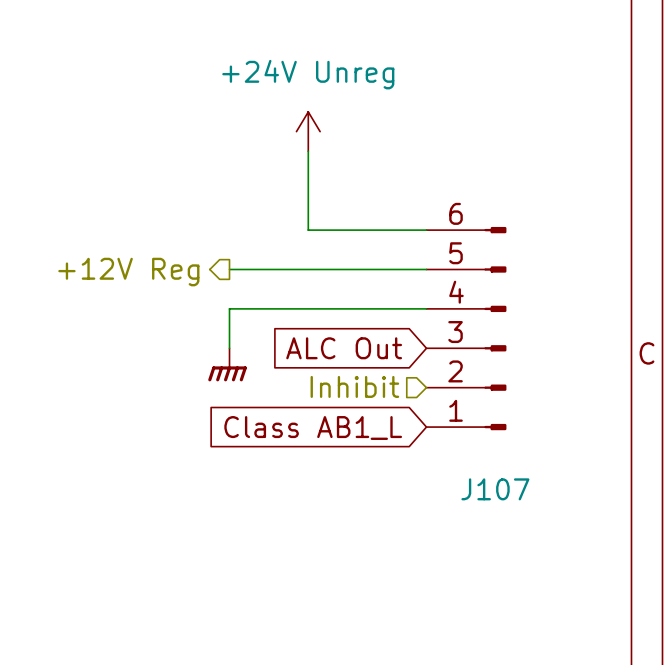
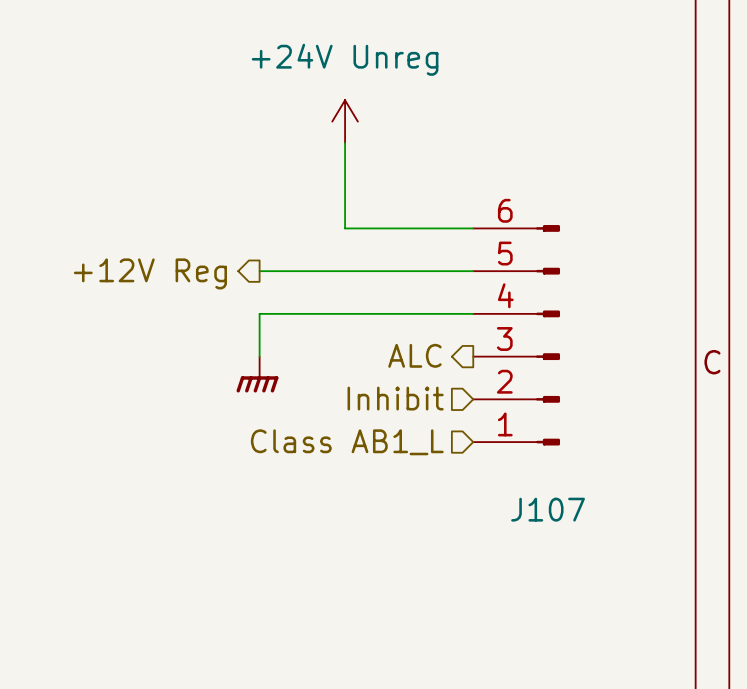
hierarchical label: none -> ALC (414, 355)
global label: ALC Out (344, 348) -> none
hierarchical label: none -> Class AB1_L (347, 442)
global label: Class AB1_L (313, 428) -> none

